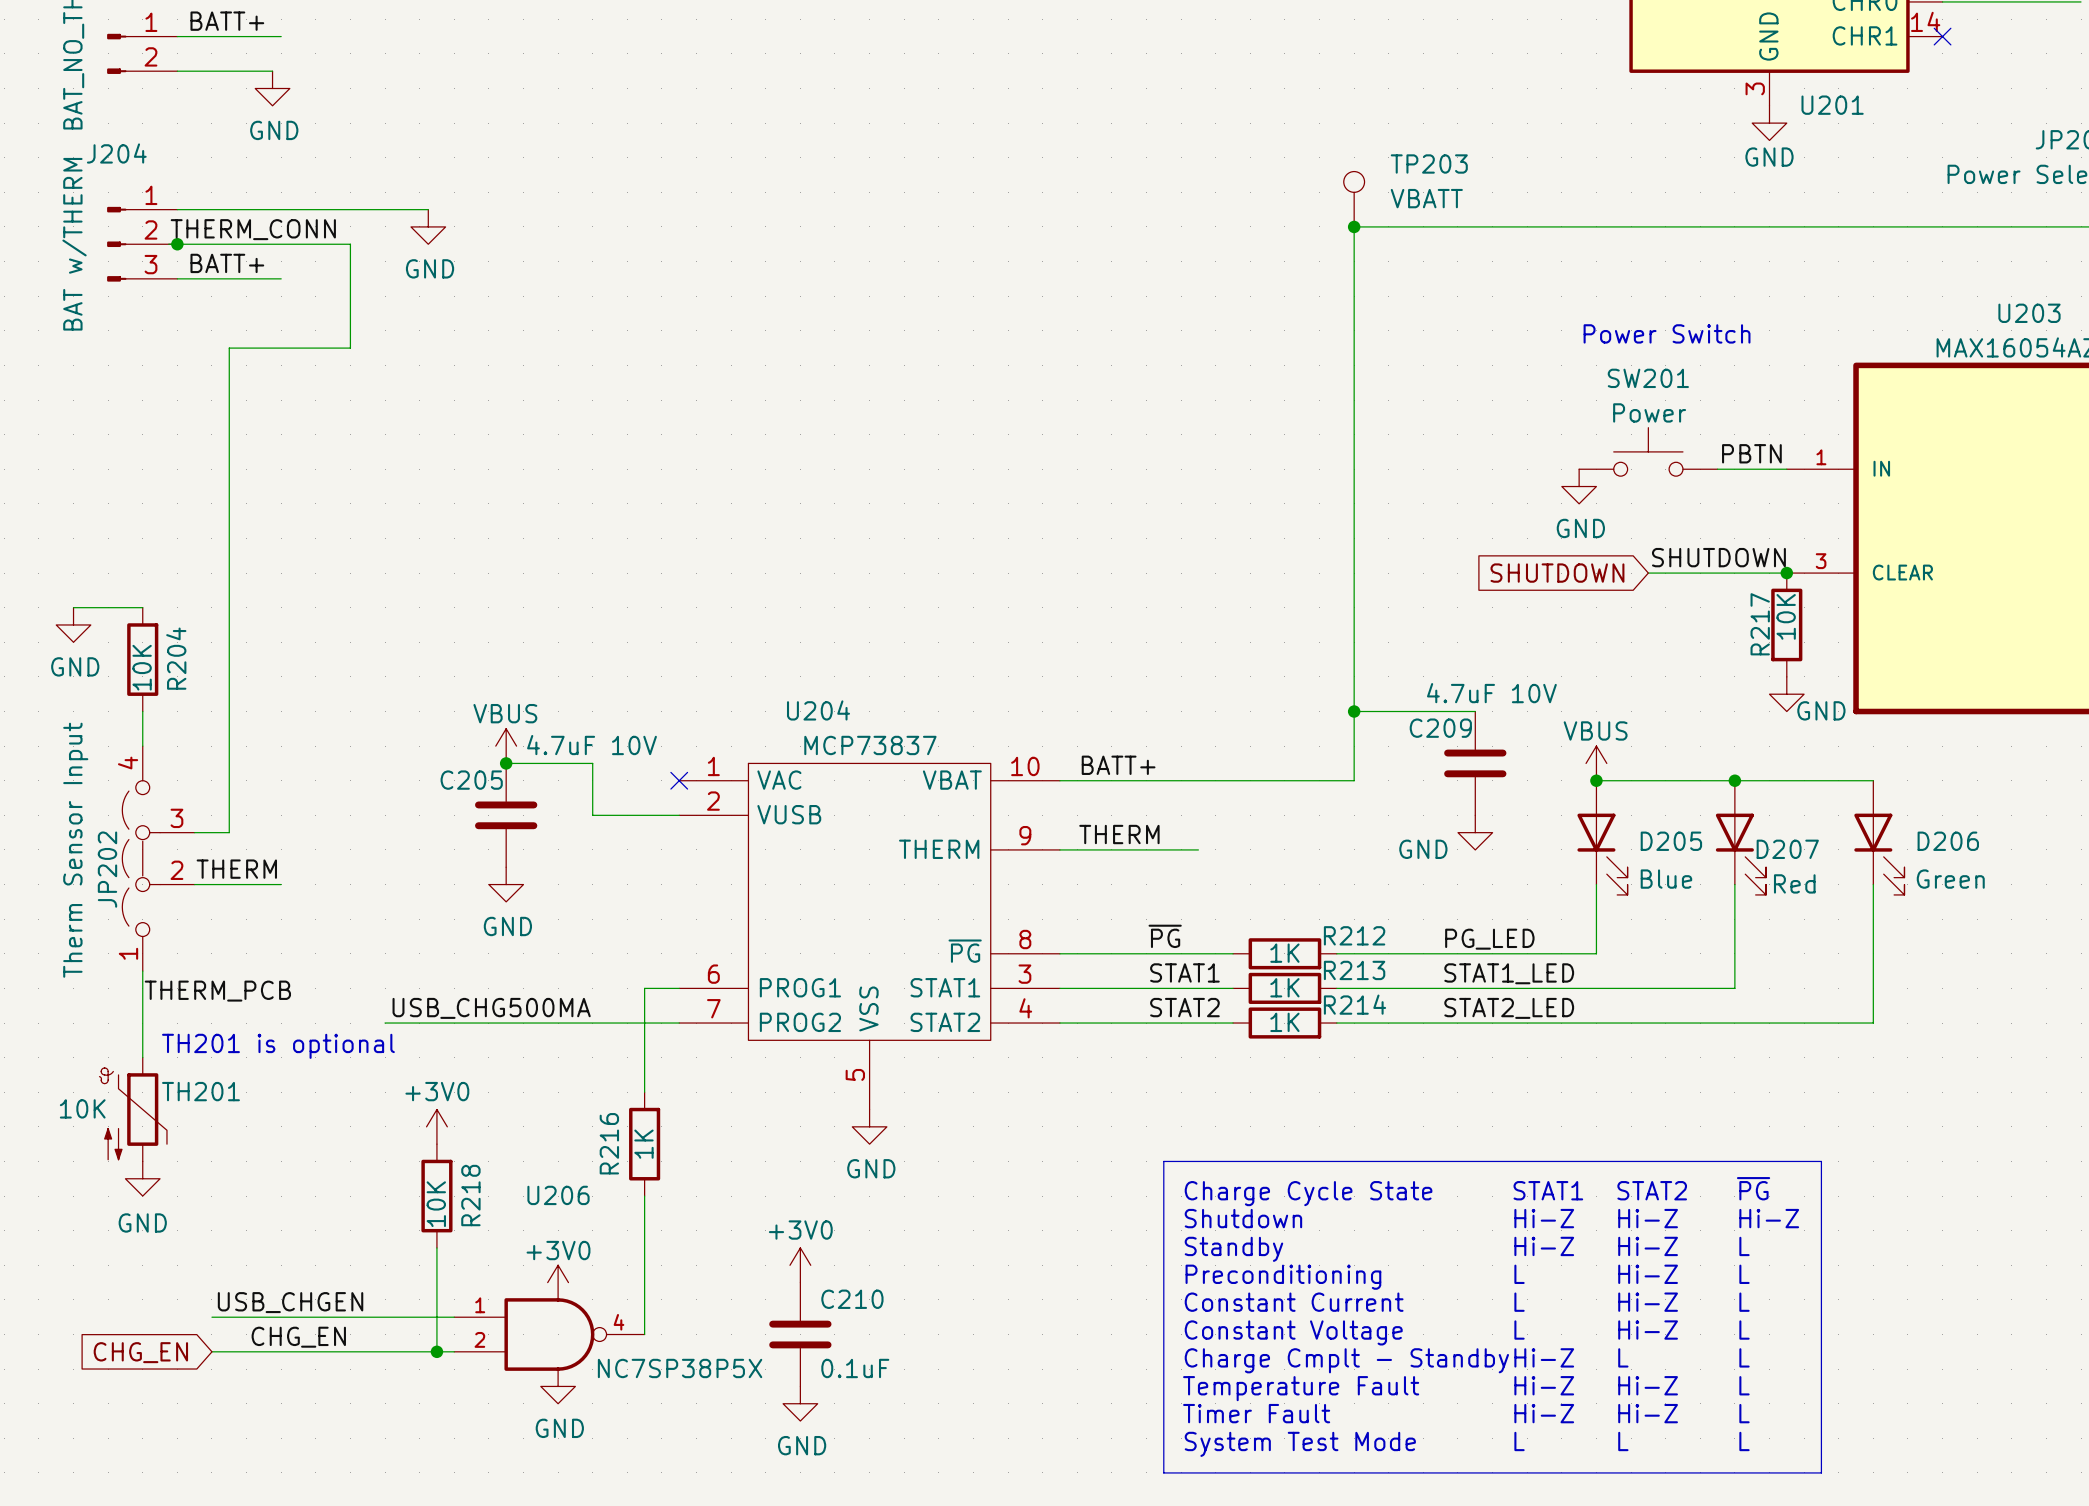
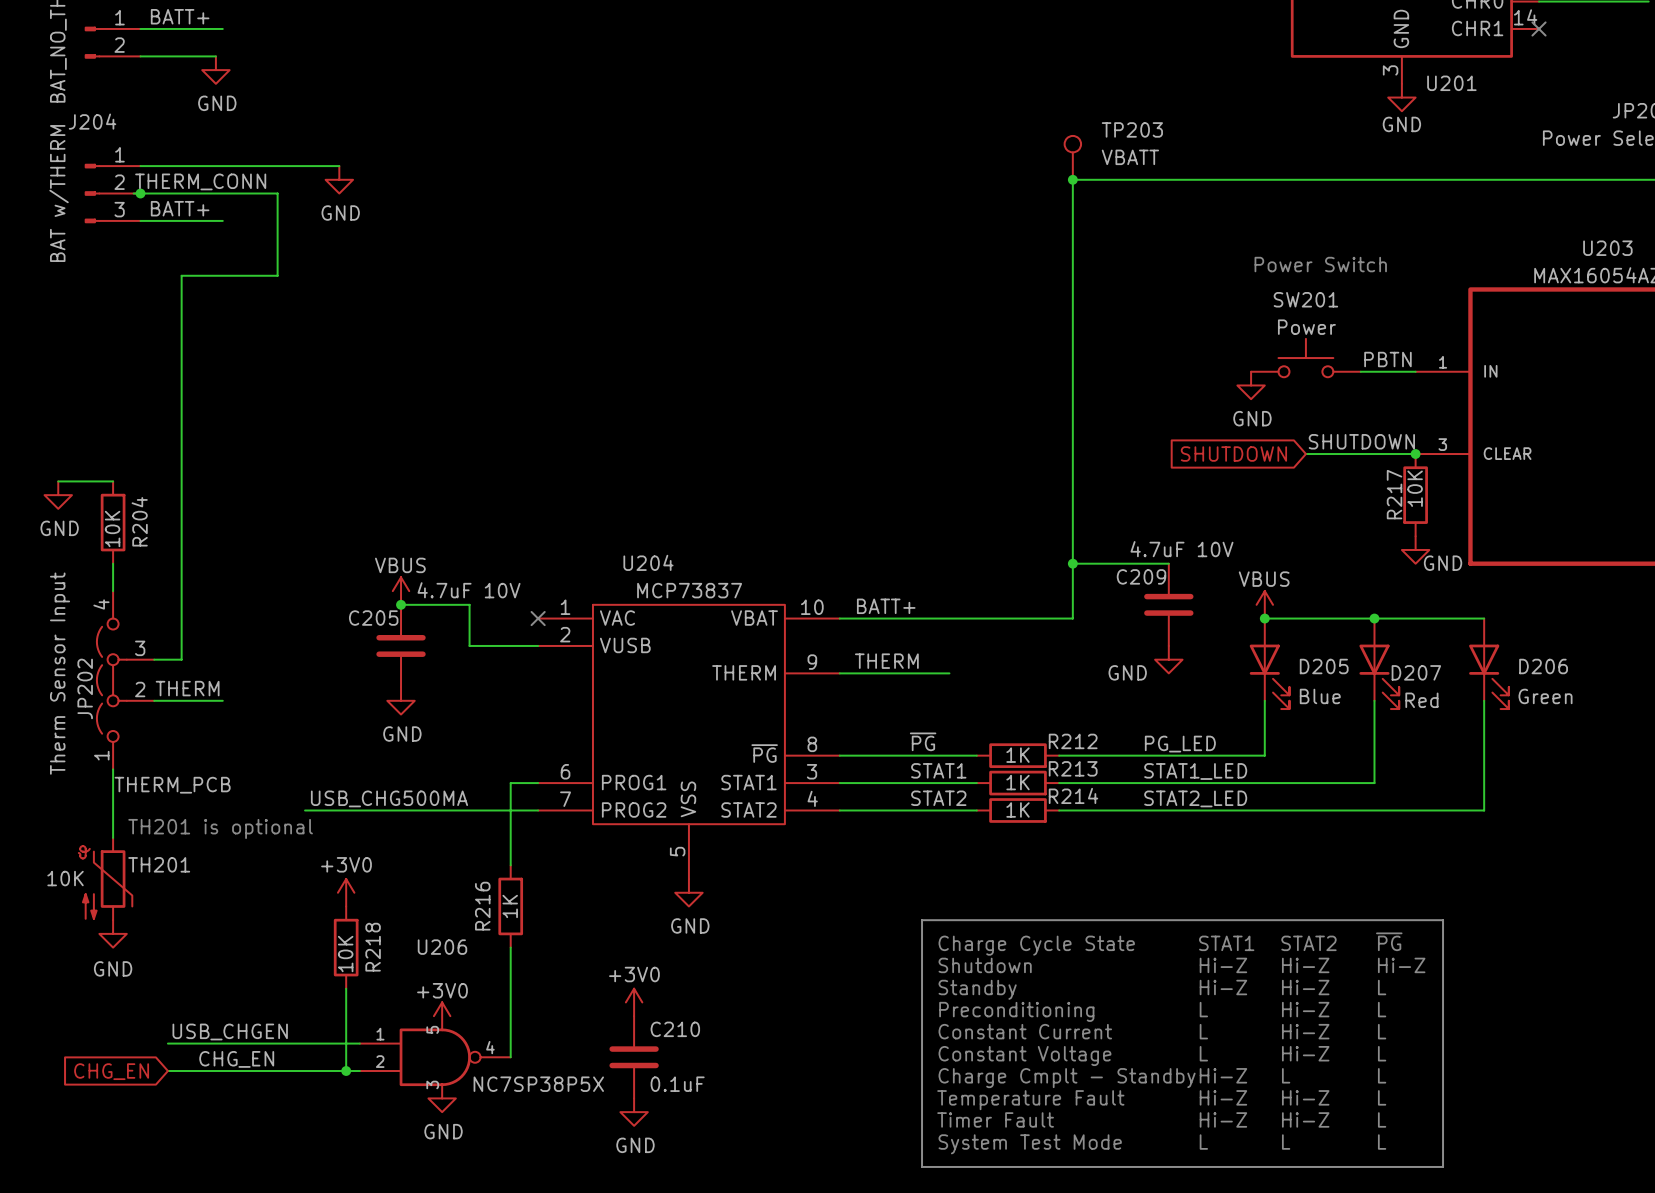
U206 pin number: none -> 5 (432, 1029)
U206 pin number: none -> 3 (432, 1084)

